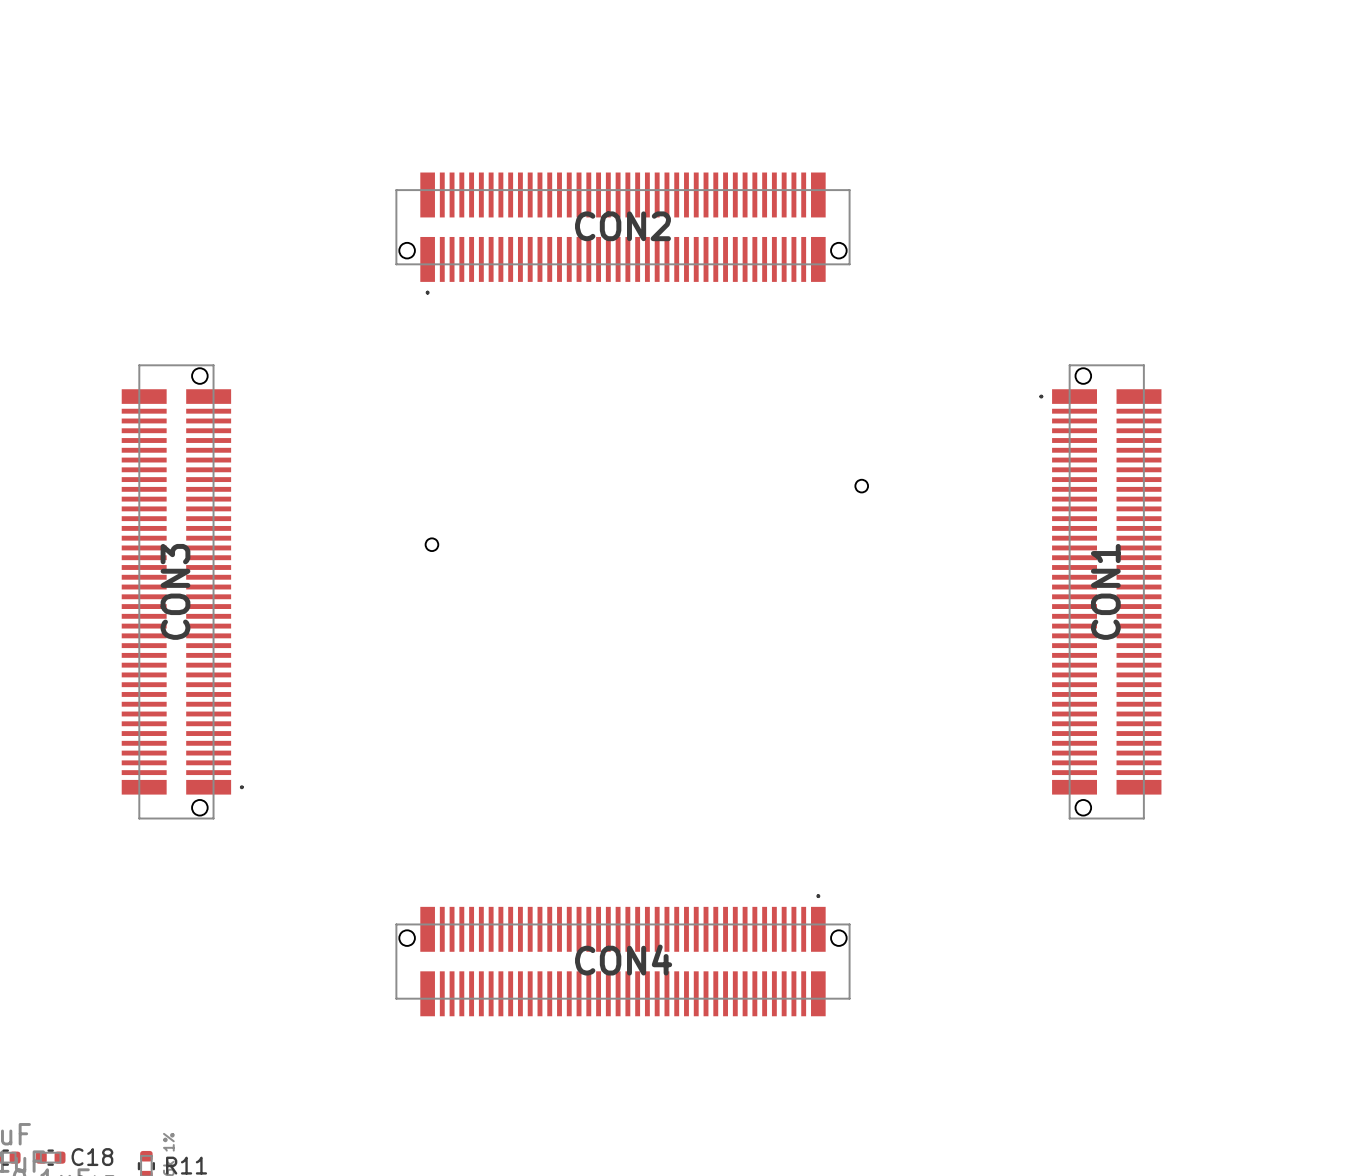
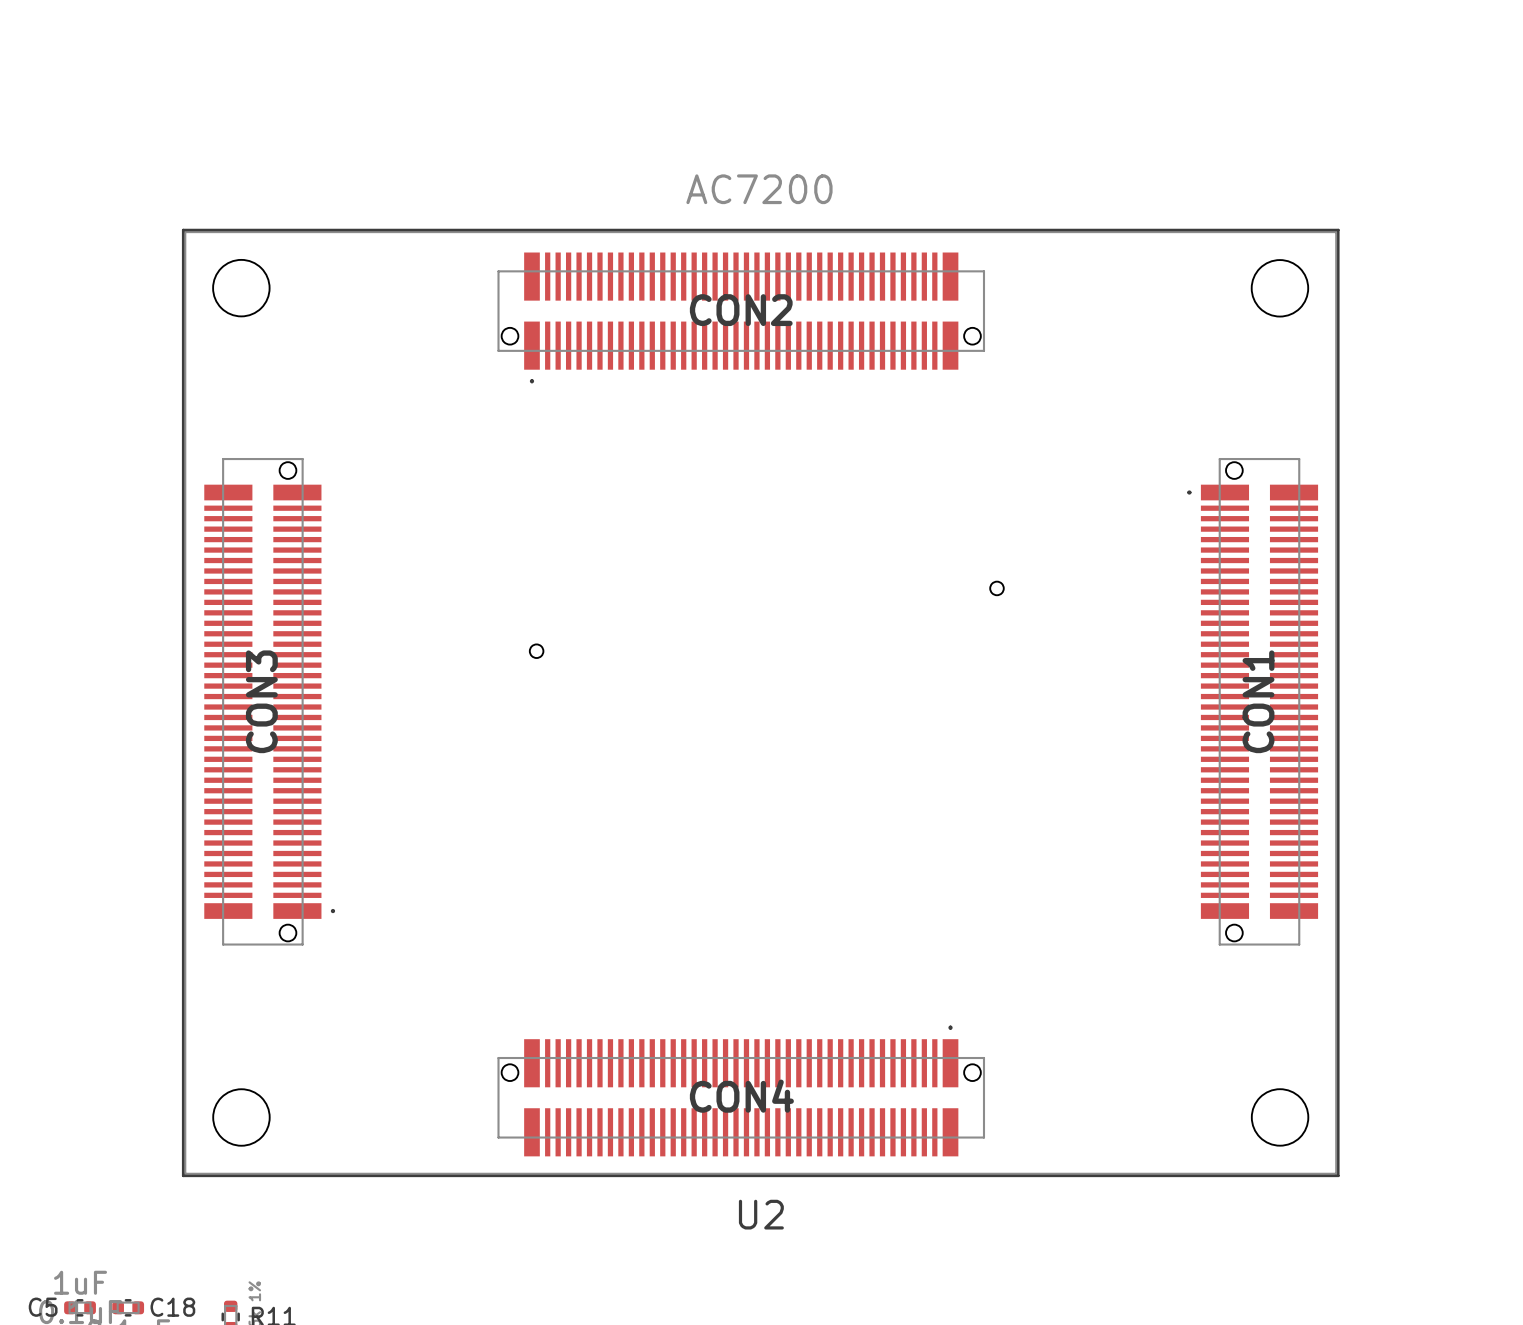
U2: none -> AC7200 (760, 702)

